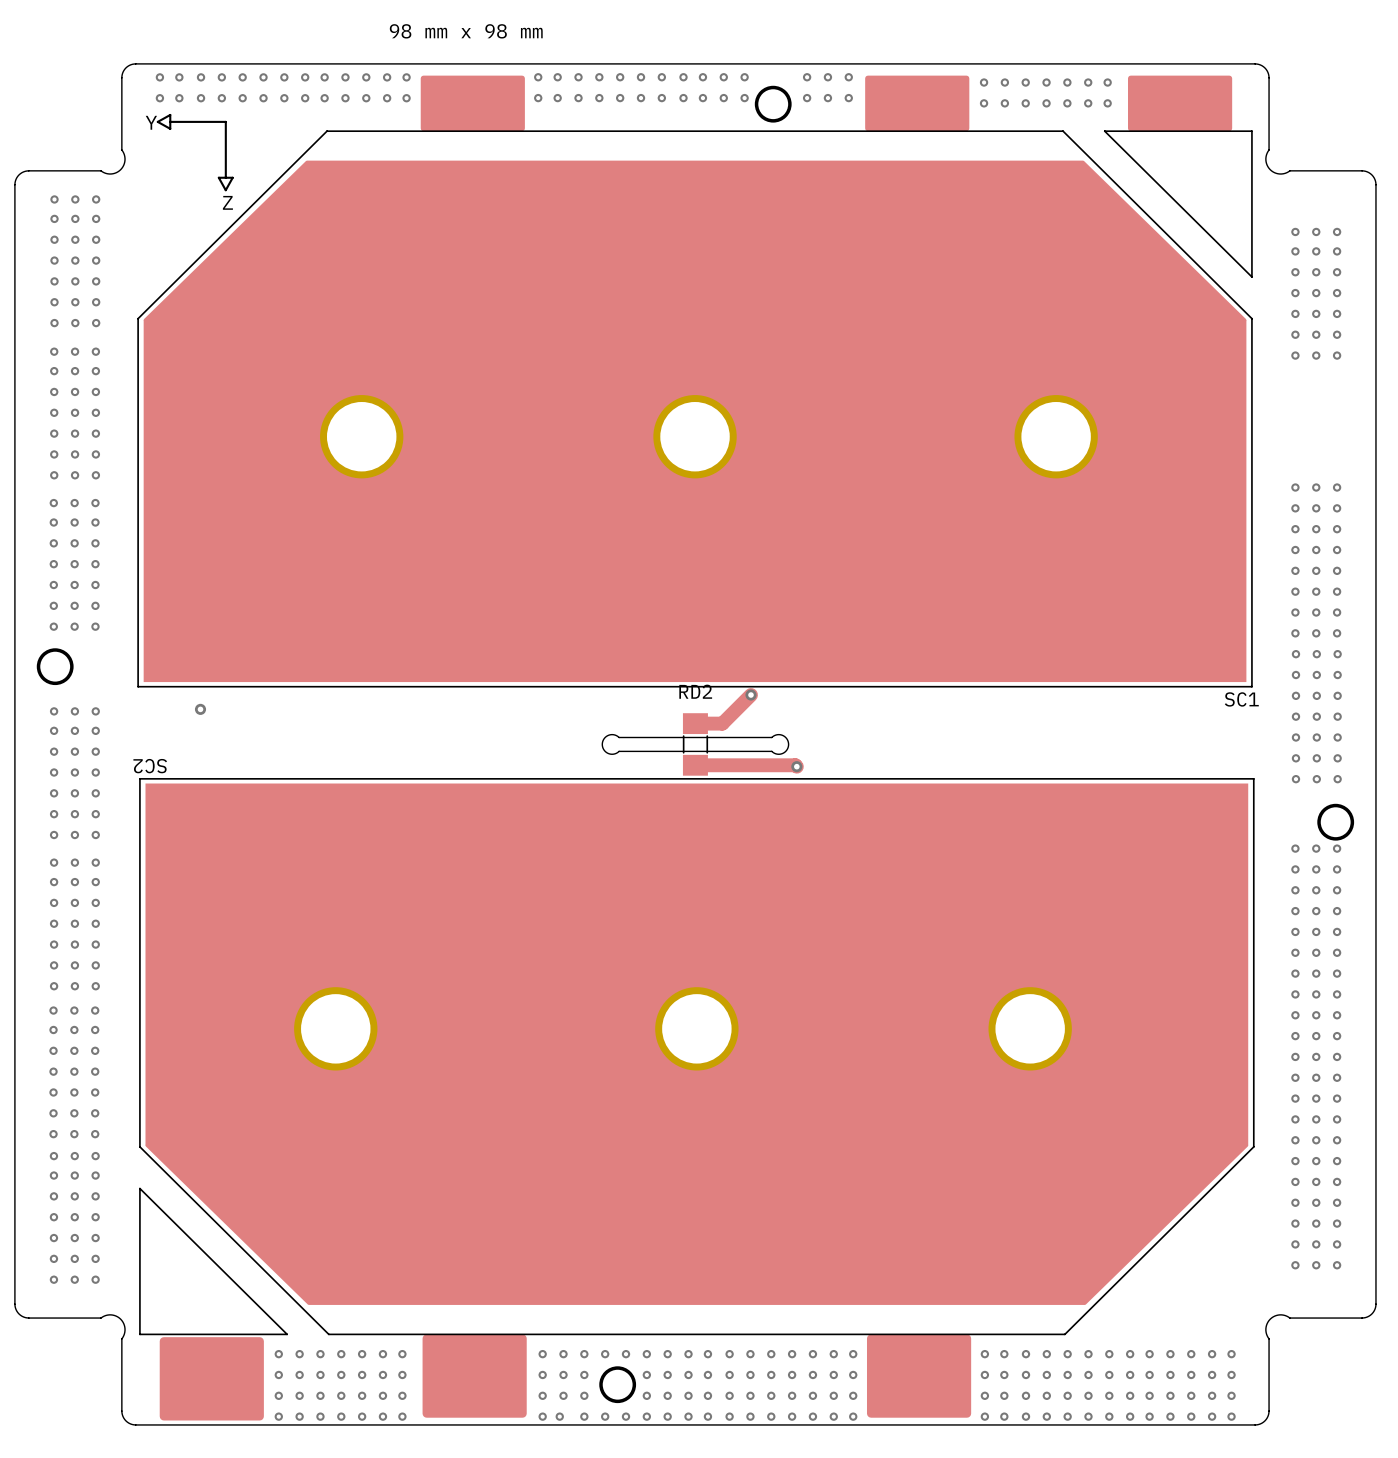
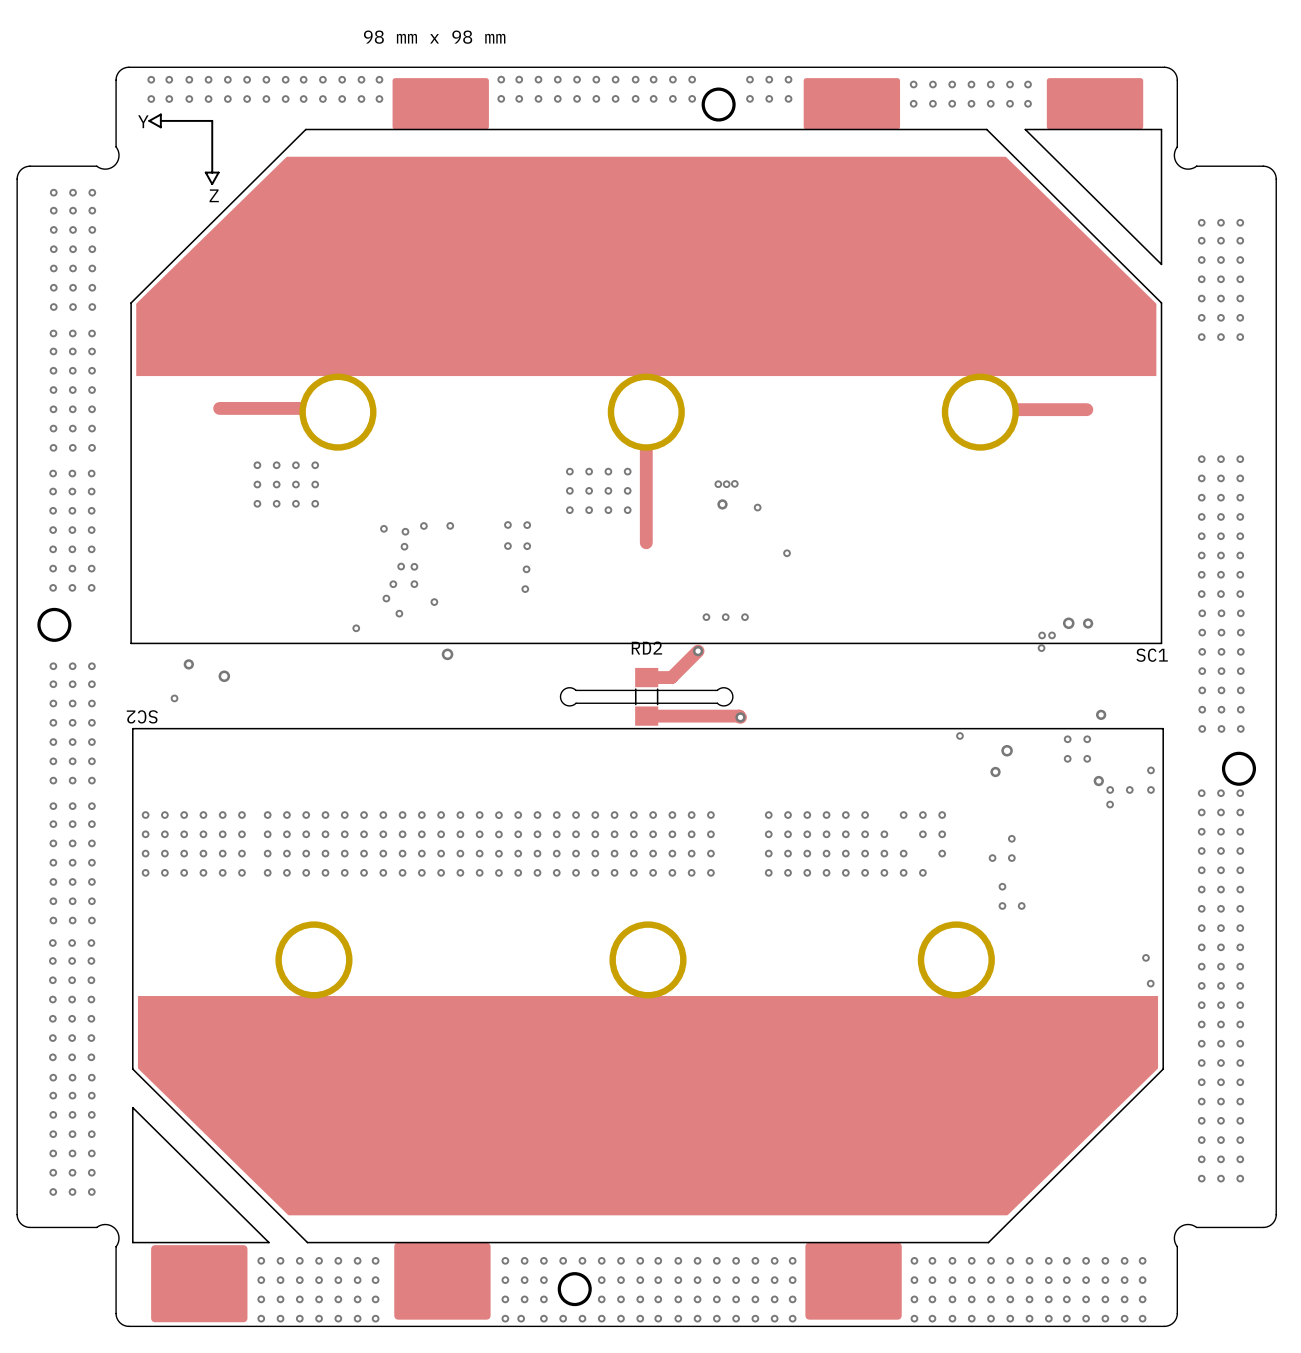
SC1 footprint: [137, 75, 1253, 688] -> [130, 78, 1163, 645]
via: none -> (257, 465)
via: none -> (276, 465)
via: none -> (295, 465)
via: none -> (315, 465)
via: none -> (569, 471)
via: none -> (589, 471)
via: none -> (608, 471)
via: none -> (627, 471)
via: none -> (257, 484)
via: none -> (276, 484)
via: none -> (295, 484)
via: none -> (315, 484)
via: none -> (718, 484)
via: none -> (726, 484)
via: none -> (734, 483)
via: none -> (569, 490)
via: none -> (589, 490)
via: none -> (608, 490)
via: none -> (627, 490)
via: none -> (257, 503)
via: none -> (276, 503)
via: none -> (295, 503)
via: none -> (315, 503)
via: none -> (722, 504)
via: none -> (757, 507)
via: none -> (569, 510)
via: none -> (589, 510)
via: none -> (608, 510)
via: none -> (627, 510)
via: none -> (507, 524)
via: none -> (527, 525)
via: none -> (423, 526)
via: none -> (450, 525)
via: none -> (383, 528)
via: none -> (405, 531)
via: none -> (507, 546)
via: none -> (527, 546)
via: none -> (404, 546)
via: none -> (787, 553)
via: none -> (401, 566)
via: none -> (414, 566)
via: none -> (526, 569)
via: none -> (393, 584)
via: none -> (414, 584)
via: none -> (525, 589)
via: none -> (386, 598)
via: none -> (434, 602)
via: none -> (399, 613)
via: none -> (706, 617)
via: none -> (725, 617)
via: none -> (744, 617)
via: none -> (1068, 623)
via: none -> (1088, 623)
via: none -> (356, 628)
via: none -> (1042, 635)
via: none -> (1052, 635)
via: none -> (1041, 648)
via: none -> (447, 654)
via: none -> (224, 676)
via: none -> (174, 698)
via: none -> (1101, 714)
SC2 footprint: [139, 778, 1255, 1421] -> [132, 727, 1164, 1323]
via: none -> (959, 735)
via: none -> (1067, 739)
via: none -> (1087, 739)
via: none -> (1007, 750)
via: none -> (1067, 758)
via: none -> (1087, 758)
via: none -> (1150, 770)
via: none -> (995, 771)
via: none -> (1098, 781)
via: none -> (1110, 789)
via: none -> (1129, 789)
via: none -> (1150, 789)
via: none -> (1110, 804)
via: none -> (145, 815)
via: none -> (164, 815)
via: none -> (184, 815)
via: none -> (203, 815)
via: none -> (222, 815)
via: none -> (241, 815)
via: none -> (267, 815)
via: none -> (286, 815)
via: none -> (306, 815)
via: none -> (325, 815)
via: none -> (344, 815)
via: none -> (364, 815)
via: none -> (383, 815)
via: none -> (402, 815)
via: none -> (421, 815)
via: none -> (441, 815)
via: none -> (460, 815)
via: none -> (479, 815)
via: none -> (498, 815)
via: none -> (518, 815)
via: none -> (537, 815)
via: none -> (556, 815)
via: none -> (576, 815)
via: none -> (595, 815)
via: none -> (614, 815)
via: none -> (633, 815)
via: none -> (653, 815)
via: none -> (672, 815)
via: none -> (691, 815)
via: none -> (710, 815)
via: none -> (768, 815)
via: none -> (788, 815)
via: none -> (807, 815)
via: none -> (826, 815)
via: none -> (845, 815)
via: none -> (865, 815)
via: none -> (903, 815)
via: none -> (922, 815)
via: none -> (942, 815)
via: none -> (145, 834)
via: none -> (164, 834)
via: none -> (184, 834)
via: none -> (203, 834)
via: none -> (222, 834)
via: none -> (241, 834)
via: none -> (267, 834)
via: none -> (286, 834)
via: none -> (306, 834)
via: none -> (325, 834)
via: none -> (344, 834)
via: none -> (364, 834)
via: none -> (383, 834)
via: none -> (402, 834)
via: none -> (421, 834)
via: none -> (441, 834)
via: none -> (460, 834)
via: none -> (479, 834)
via: none -> (498, 834)
via: none -> (518, 834)
via: none -> (537, 834)
via: none -> (556, 834)
via: none -> (576, 834)
via: none -> (595, 834)
via: none -> (614, 834)
via: none -> (633, 834)
via: none -> (653, 834)
via: none -> (672, 834)
via: none -> (691, 834)
via: none -> (710, 834)
via: none -> (768, 834)
via: none -> (788, 834)
via: none -> (807, 834)
via: none -> (826, 834)
via: none -> (845, 834)
via: none -> (865, 834)
via: none -> (884, 834)
via: none -> (922, 834)
via: none -> (942, 834)
via: none -> (1011, 838)
via: none -> (145, 853)
via: none -> (164, 853)
via: none -> (184, 853)
via: none -> (203, 853)
via: none -> (222, 853)
via: none -> (241, 853)
via: none -> (267, 853)
via: none -> (286, 853)
via: none -> (306, 853)
via: none -> (325, 853)
via: none -> (344, 853)
via: none -> (364, 853)
via: none -> (383, 853)
via: none -> (402, 853)
via: none -> (421, 853)
via: none -> (441, 853)
via: none -> (460, 853)
via: none -> (479, 853)
via: none -> (518, 853)
via: none -> (537, 853)
via: none -> (556, 853)
via: none -> (576, 853)
via: none -> (595, 853)
via: none -> (614, 853)
via: none -> (633, 853)
via: none -> (653, 853)
via: none -> (672, 853)
via: none -> (691, 853)
via: none -> (710, 853)
via: none -> (768, 853)
via: none -> (788, 853)
via: none -> (807, 853)
via: none -> (826, 853)
via: none -> (845, 853)
via: none -> (865, 853)
via: none -> (884, 853)
via: none -> (903, 853)
via: none -> (942, 853)
via: none -> (498, 853)
via: none -> (992, 858)
via: none -> (1011, 858)
via: none -> (145, 872)
via: none -> (164, 872)
via: none -> (184, 872)
via: none -> (203, 872)
via: none -> (222, 872)
via: none -> (241, 872)
via: none -> (267, 872)
via: none -> (286, 872)
via: none -> (306, 872)
via: none -> (325, 872)
via: none -> (344, 872)
via: none -> (364, 872)
via: none -> (383, 872)
via: none -> (402, 872)
via: none -> (421, 872)
via: none -> (441, 872)
via: none -> (460, 872)
via: none -> (479, 872)
via: none -> (498, 872)
via: none -> (518, 872)
via: none -> (537, 872)
via: none -> (556, 872)
via: none -> (576, 872)
via: none -> (595, 872)
via: none -> (614, 872)
via: none -> (633, 872)
via: none -> (653, 872)
via: none -> (672, 872)
via: none -> (691, 872)
via: none -> (710, 872)
via: none -> (768, 872)
via: none -> (788, 872)
via: none -> (807, 872)
via: none -> (826, 872)
via: none -> (845, 872)
via: none -> (865, 872)
via: none -> (884, 872)
via: none -> (903, 872)
via: none -> (922, 872)
via: none -> (1002, 886)
via: none -> (1002, 905)
via: none -> (1021, 905)
via: none -> (1145, 957)
via: none -> (1150, 983)

